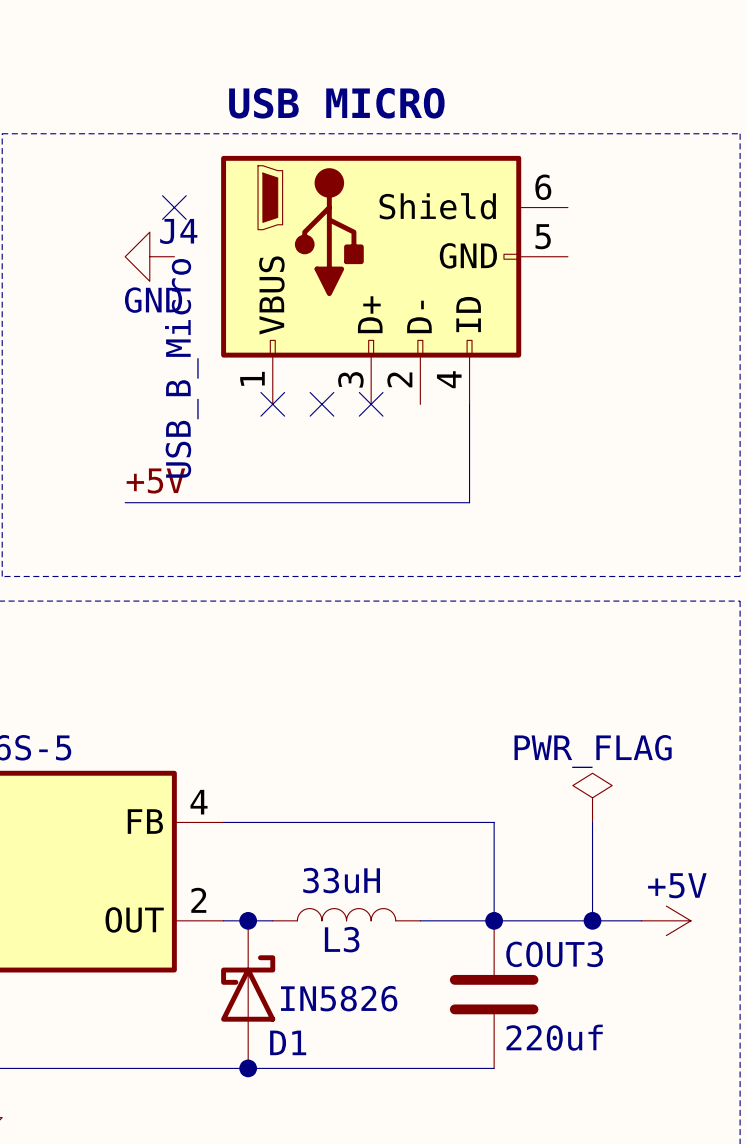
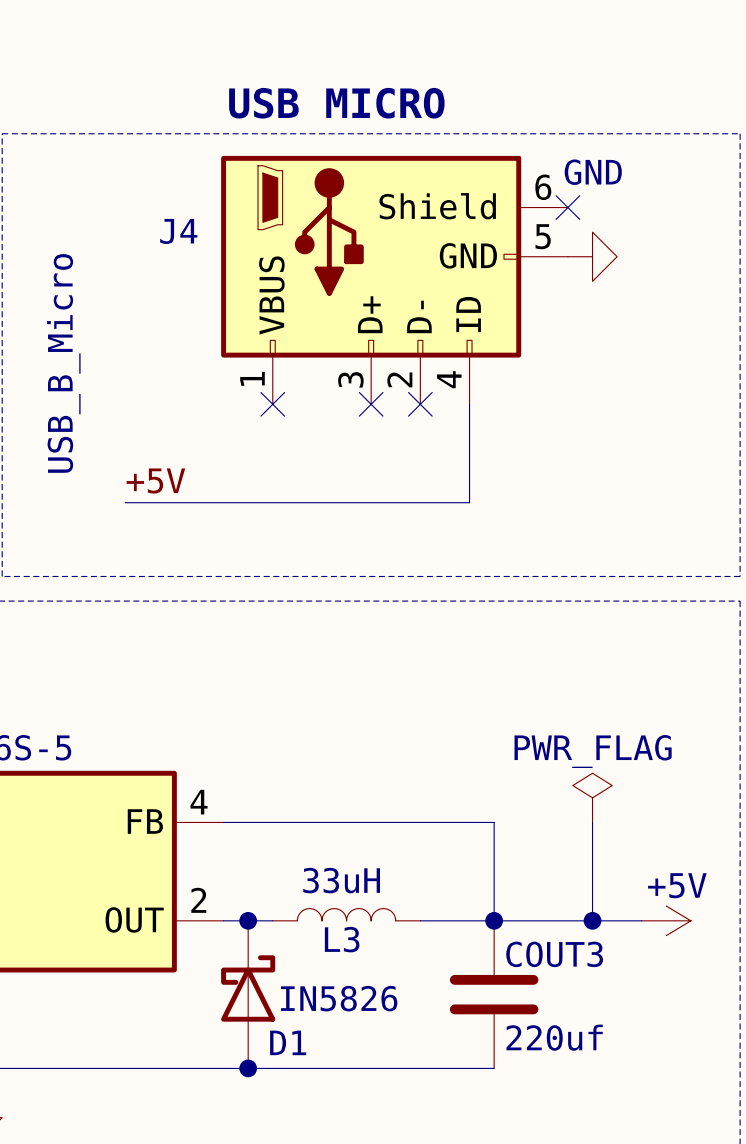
no-connect mark: (174, 207) -> none
no-connect mark: none -> (567, 207)
power symbol rotation: 0° (149, 256) -> 180° (592, 256)
power symbol position: GND (149, 256) -> GND (592, 256)
power symbol text position: GND (153, 300) -> GND (593, 172)
J4 value position: USB_B_Micro (181, 368) -> USB_B_Micro (63, 363)
no-connect mark position: (321, 404) -> (420, 404)

